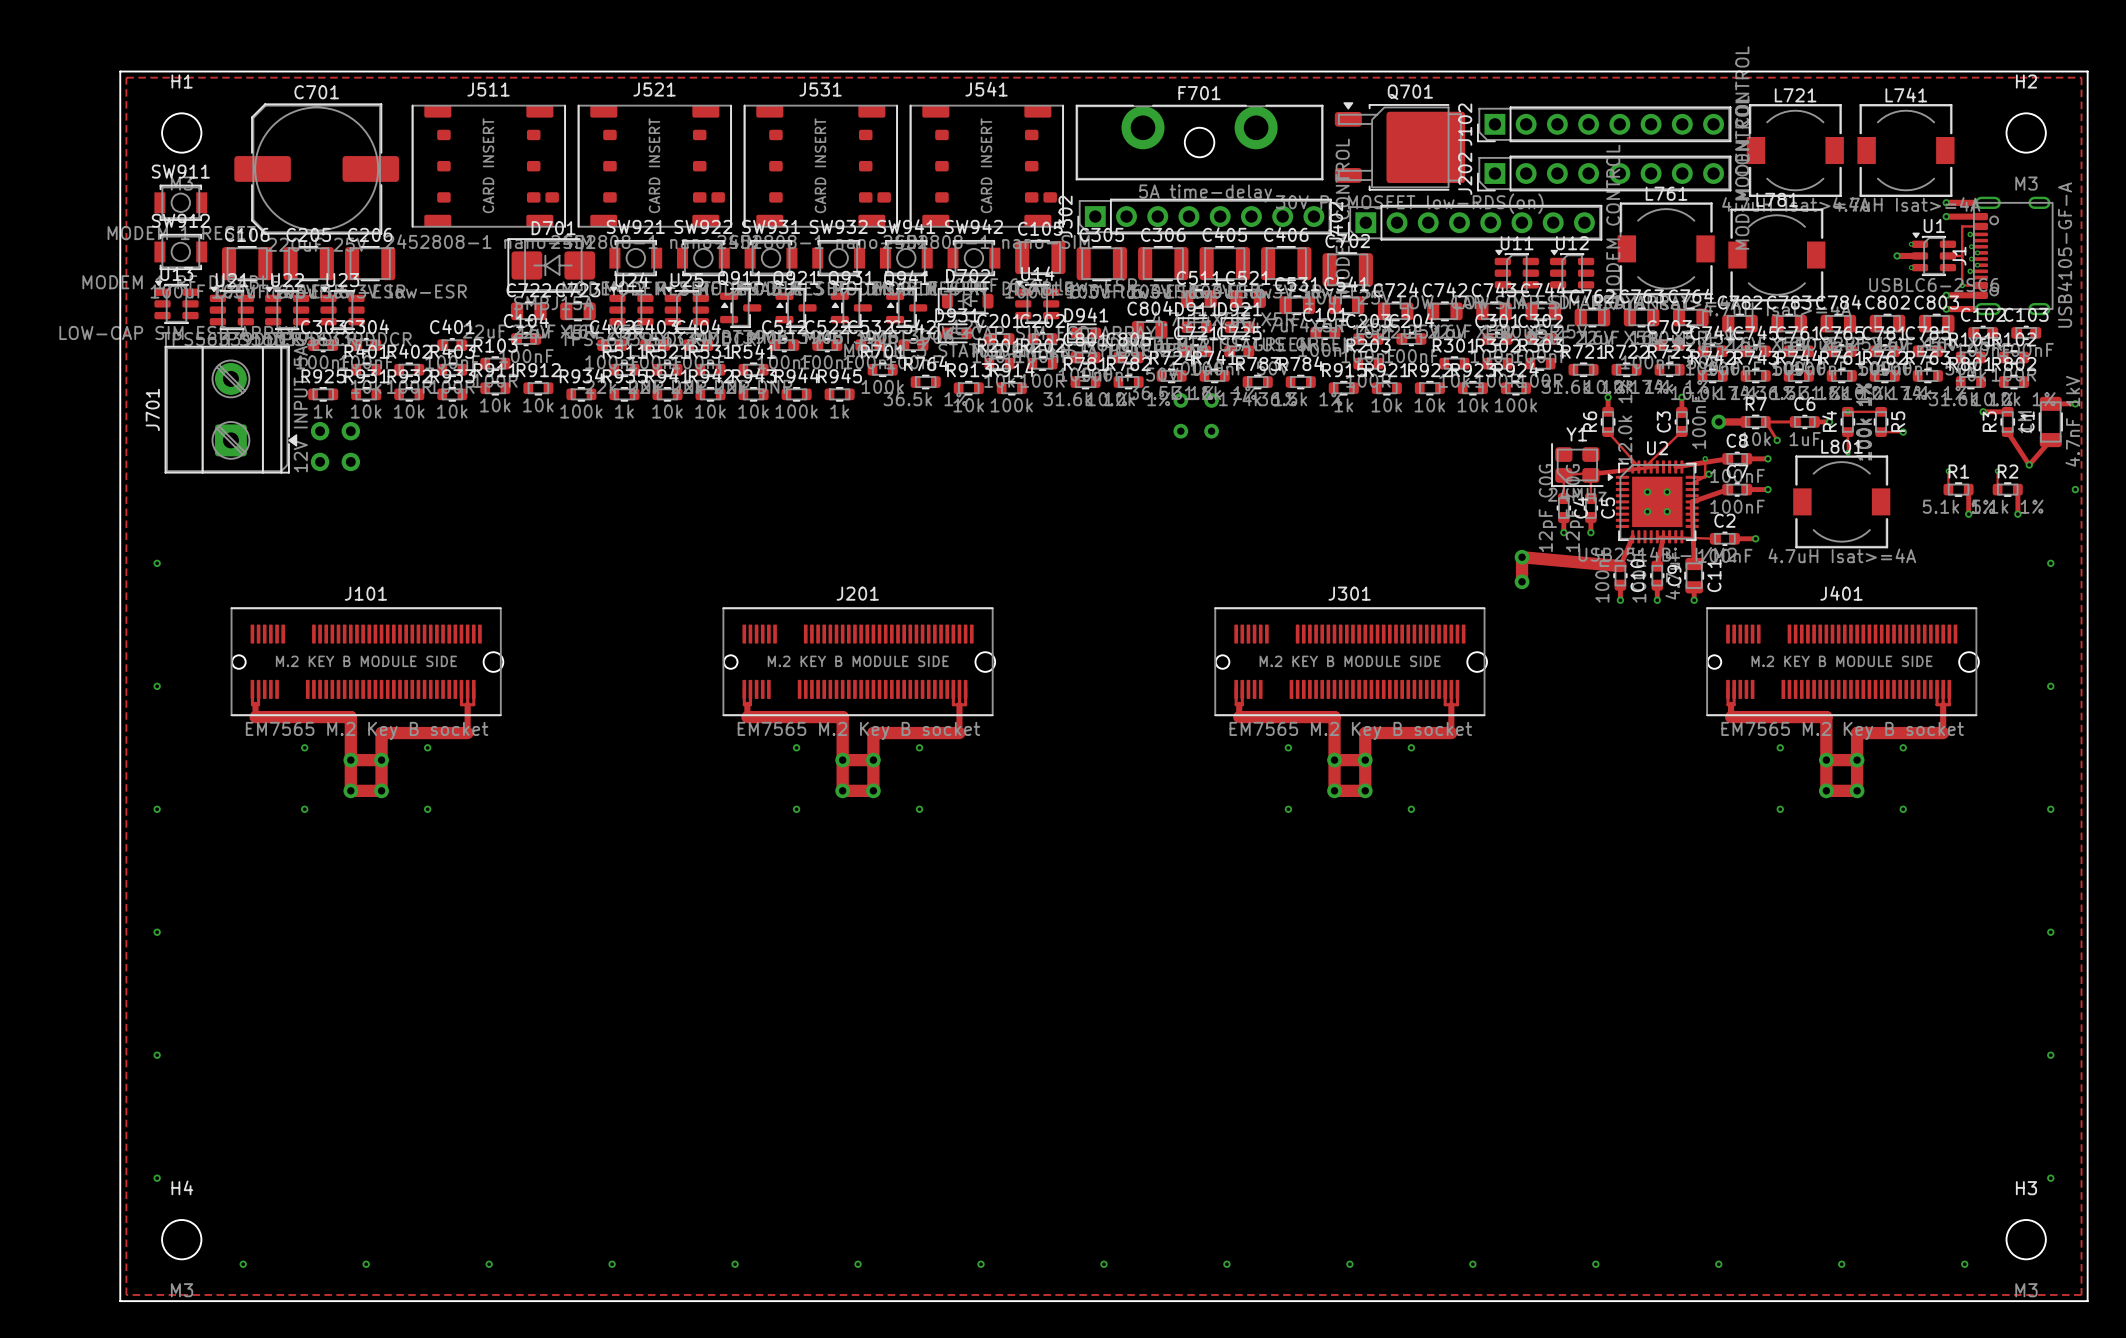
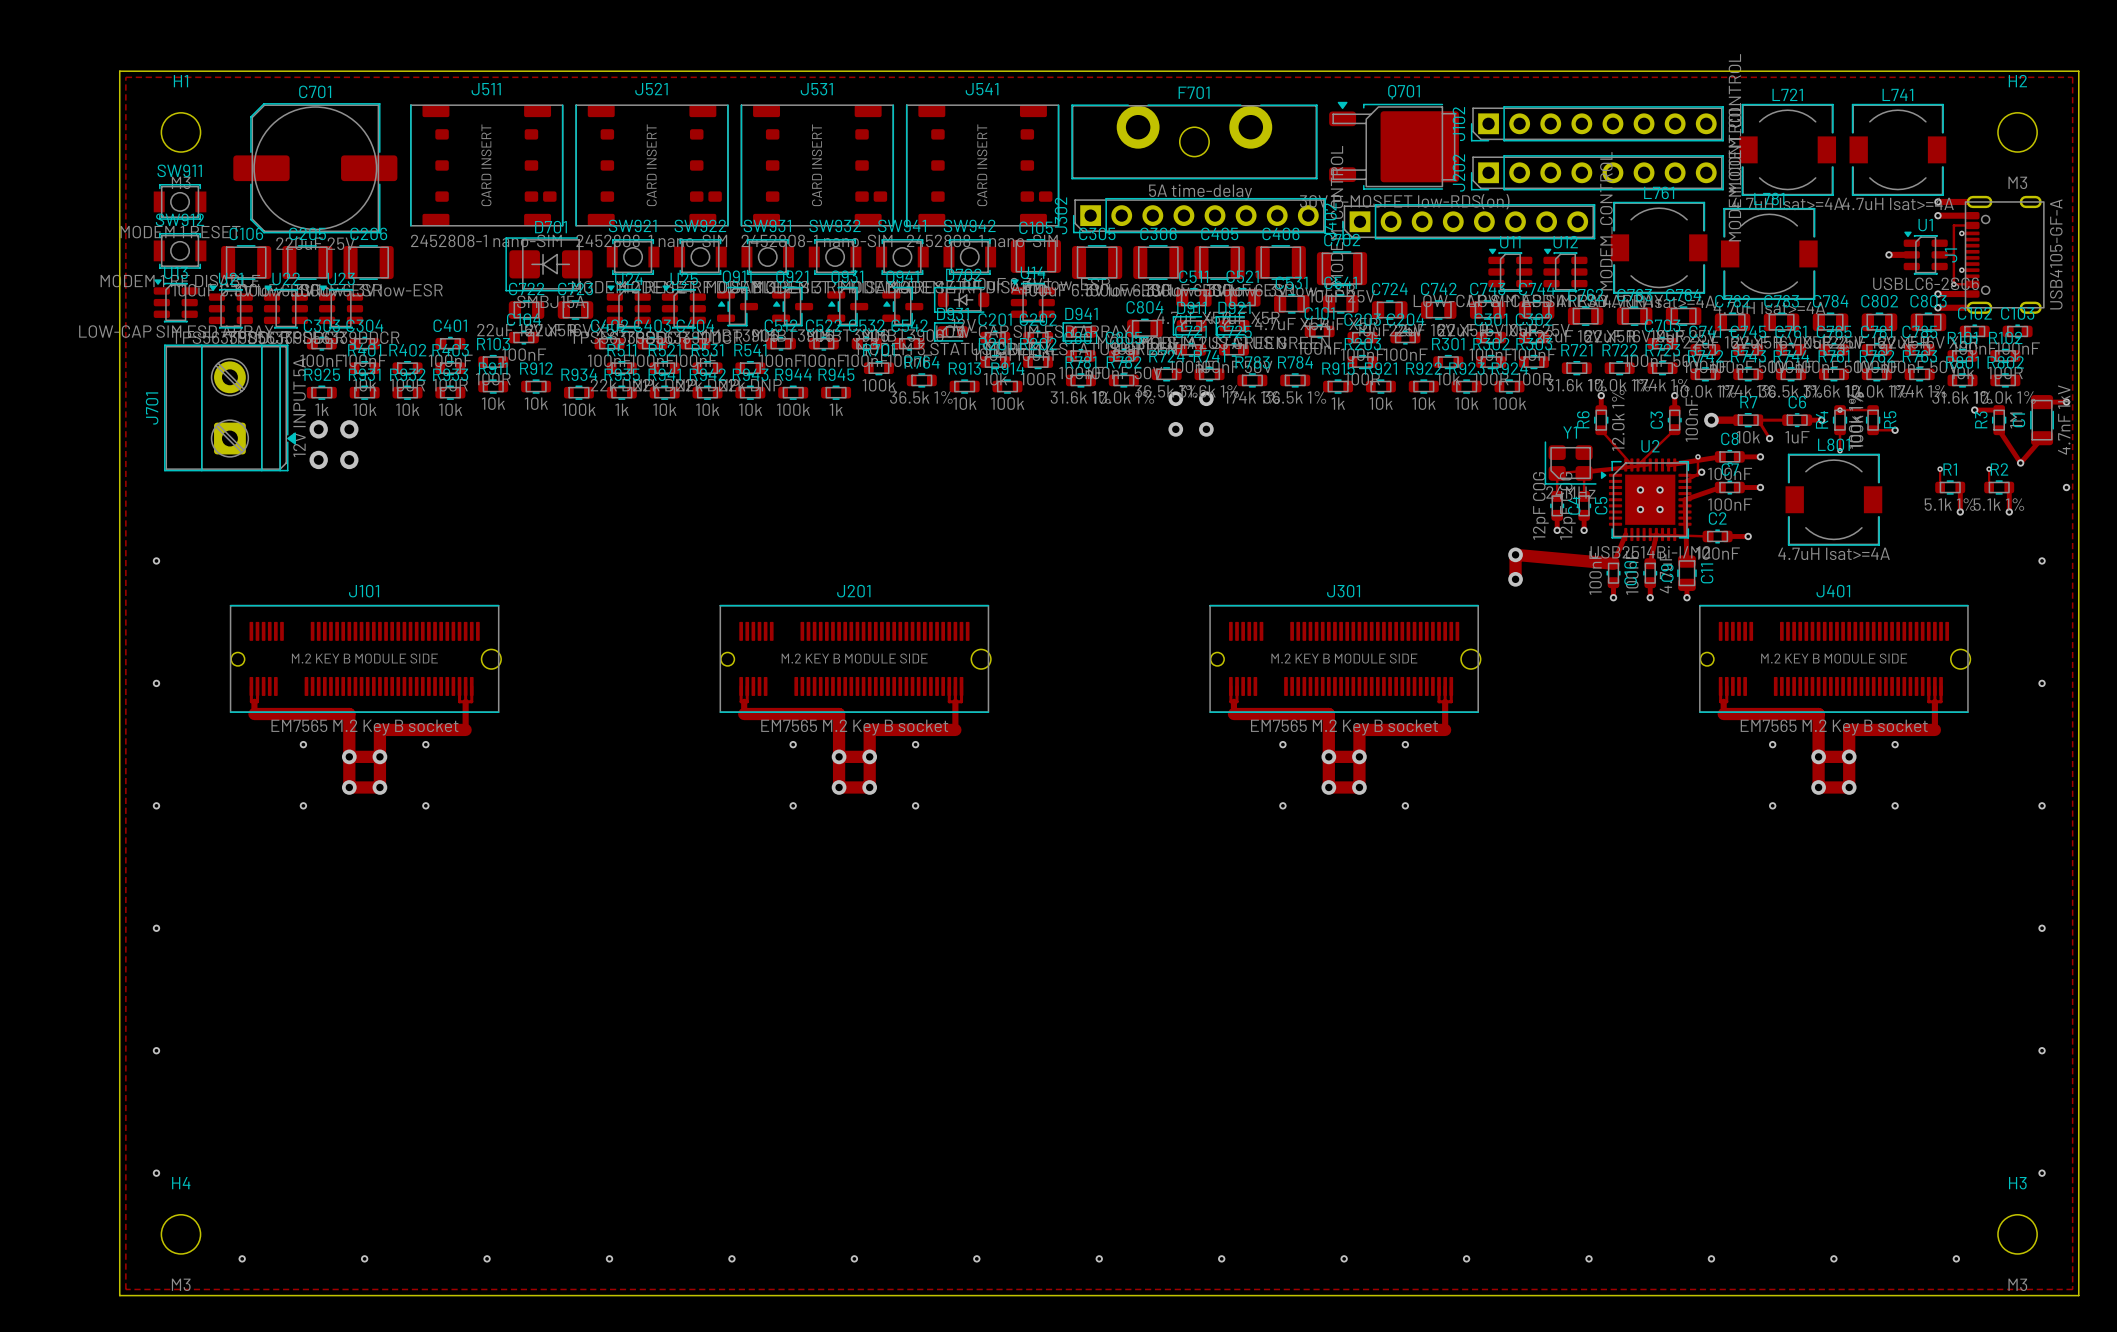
via: (1911, 244) -> none
via: (1971, 246) -> none
via: (1977, 252) -> none
via: (1971, 259) -> none
via: (1977, 265) -> none
via: (1911, 267) -> none

